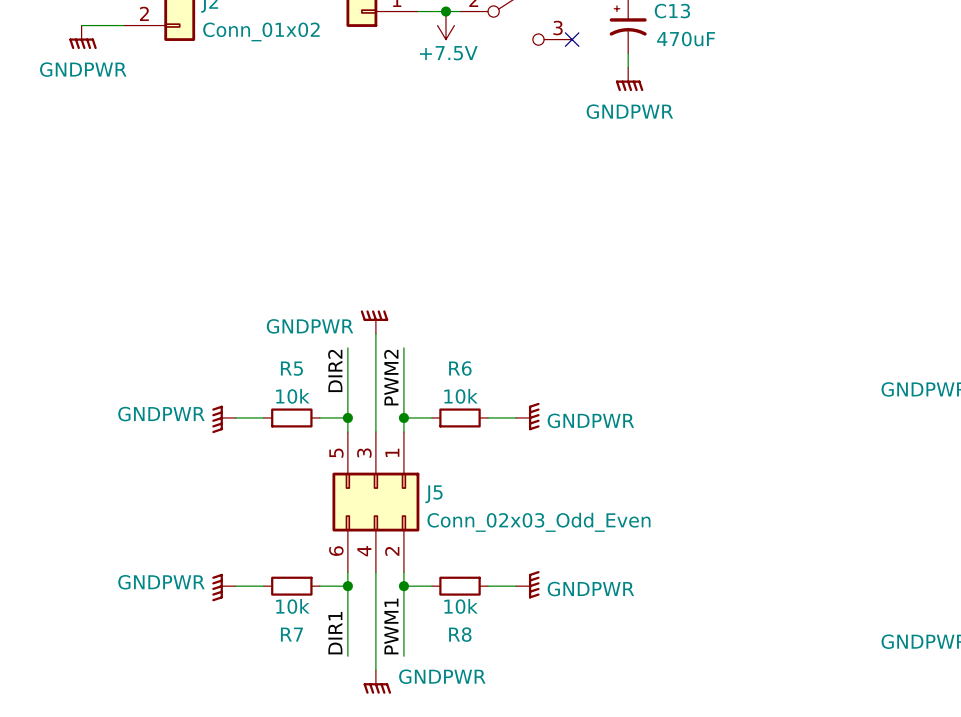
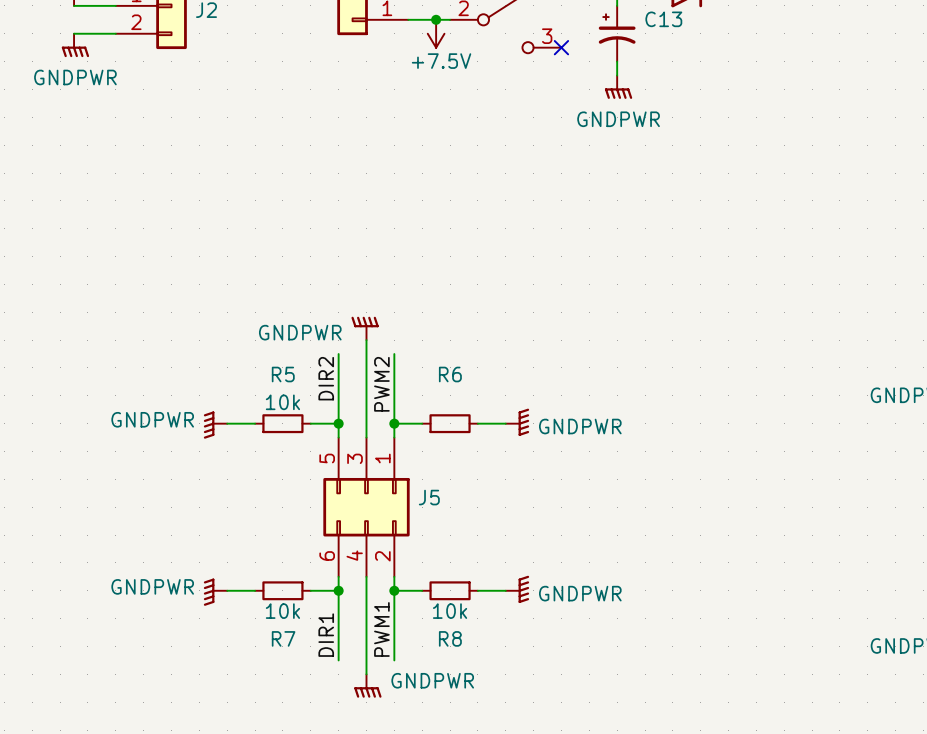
J2 value: Conn_01x02 (261, 31) -> none
C13 value: 470uF (686, 39) -> none
R6 value: 10k (461, 396) -> none
J5 value: Conn_02x03_Odd_Even (538, 522) -> none

